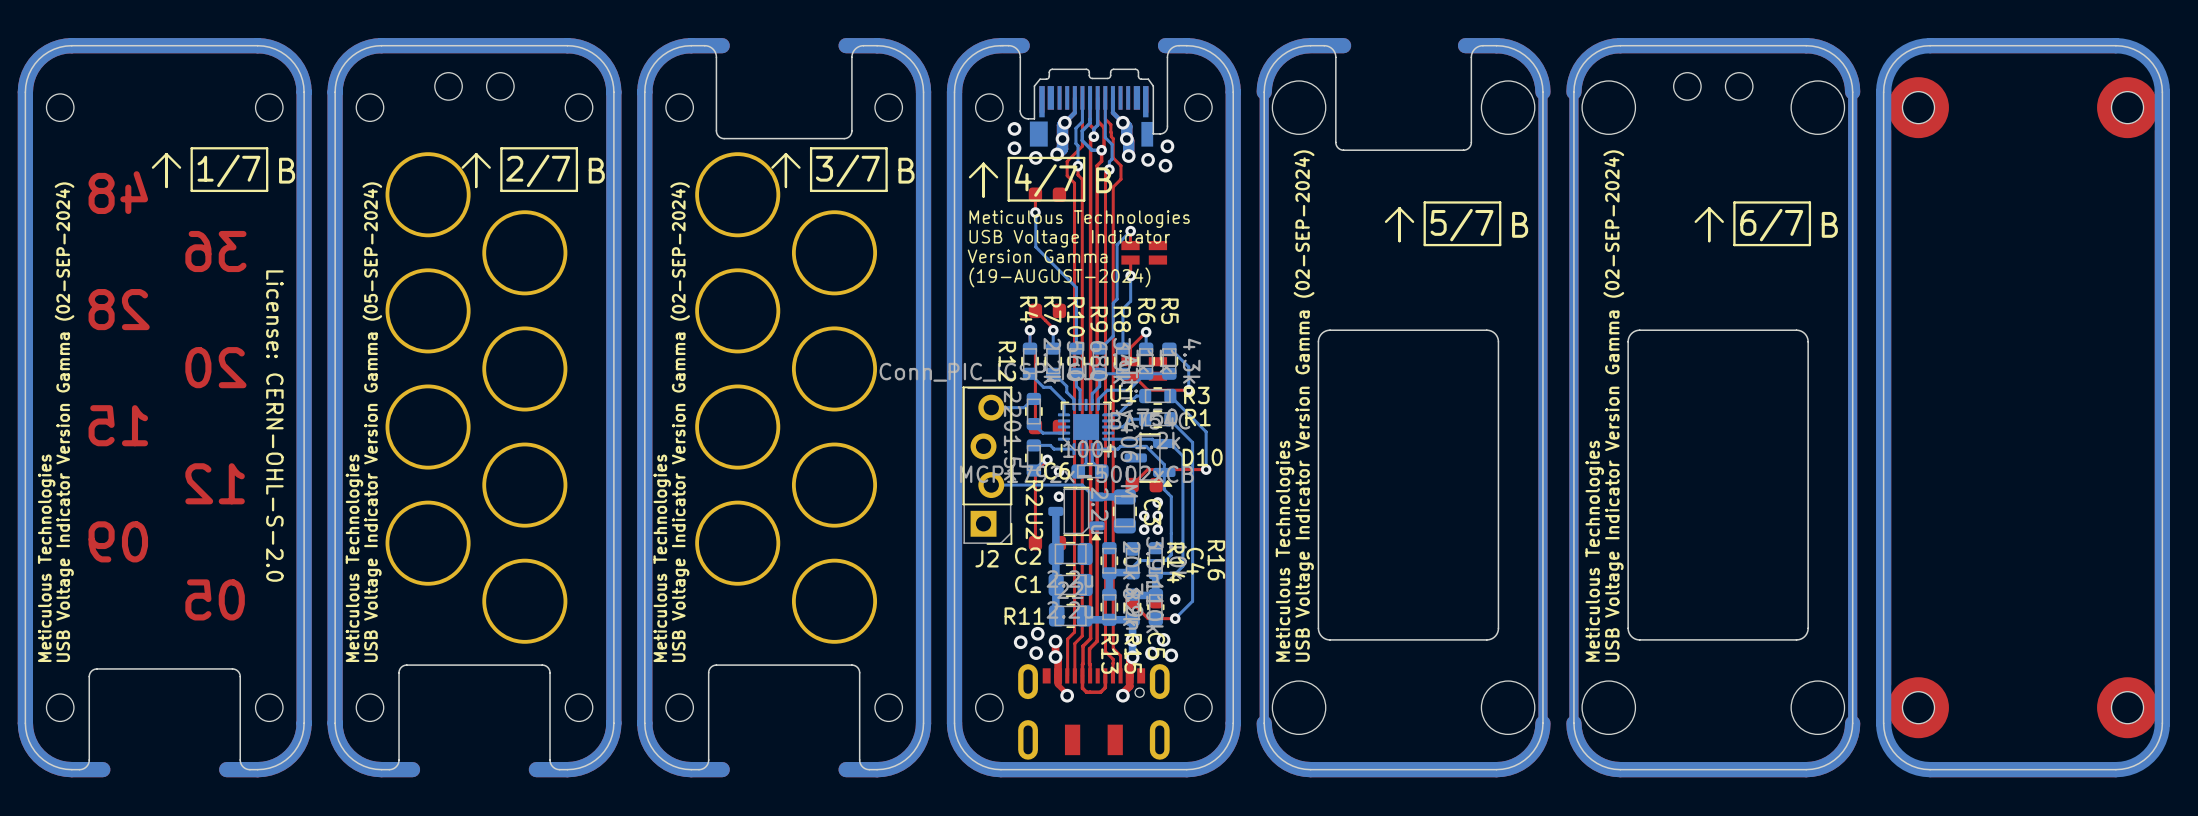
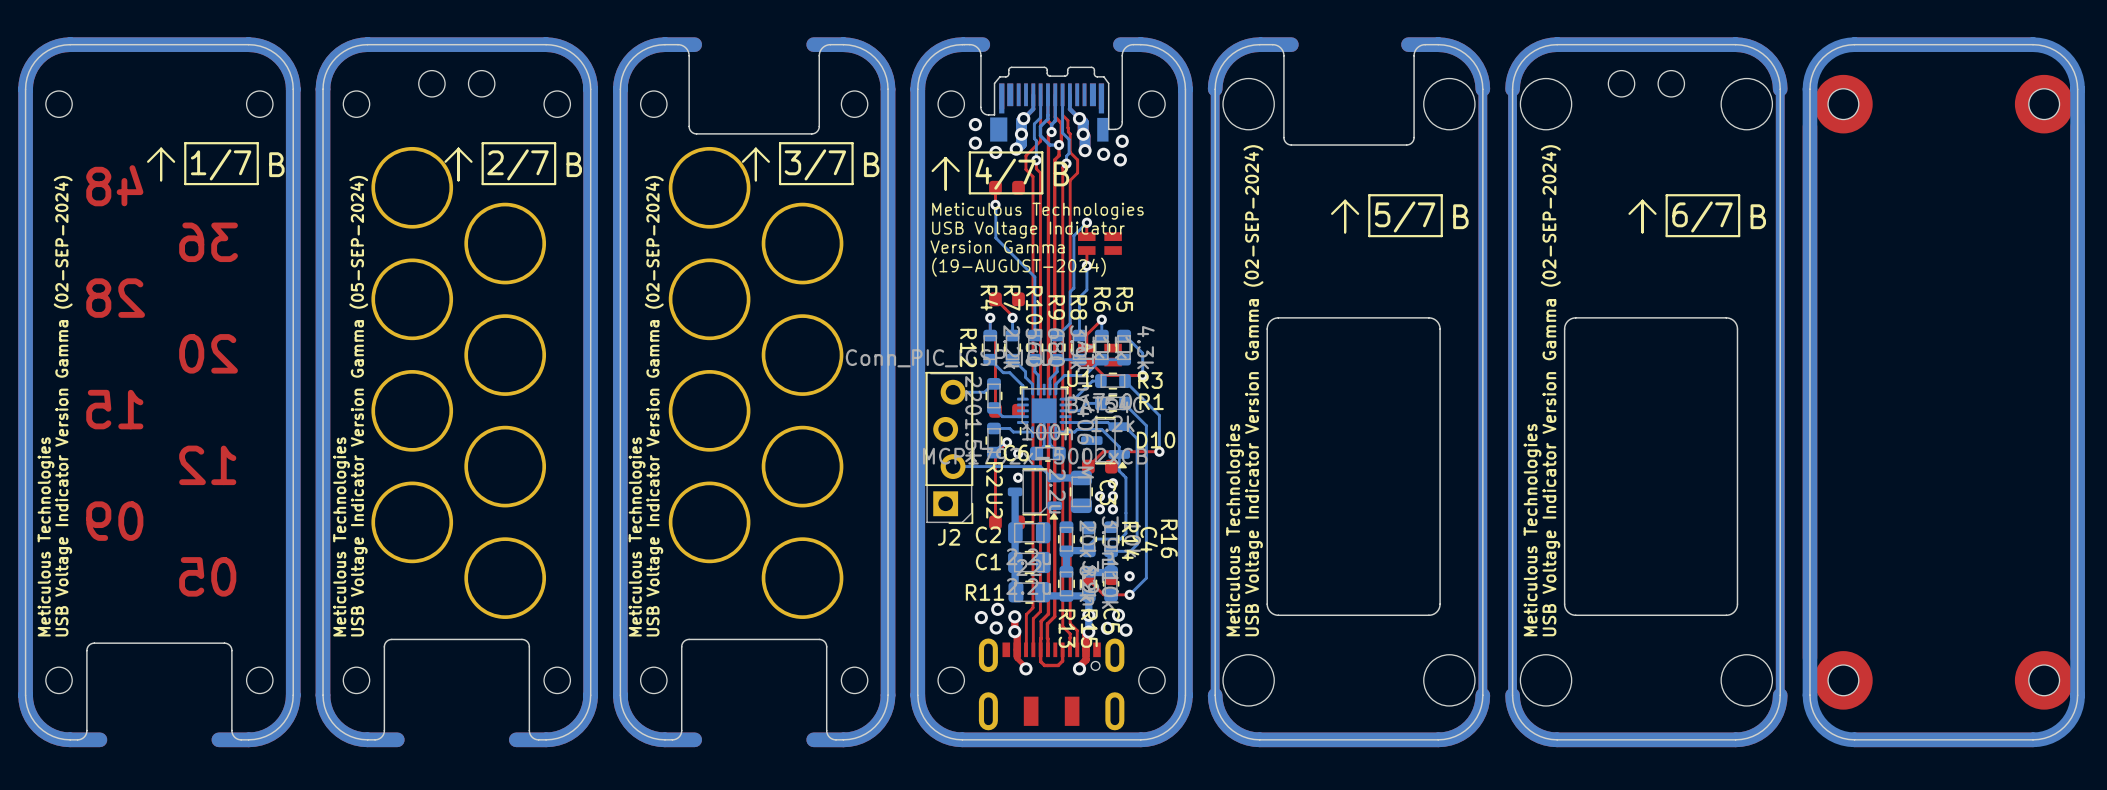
text: License: CERN-OHL-S-2.0 (274, 426) -> none

